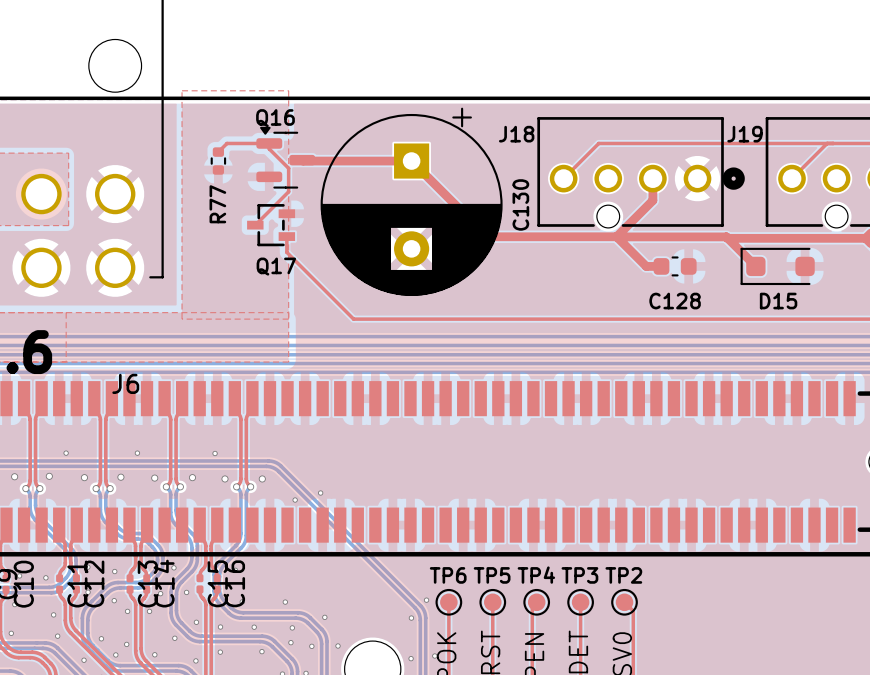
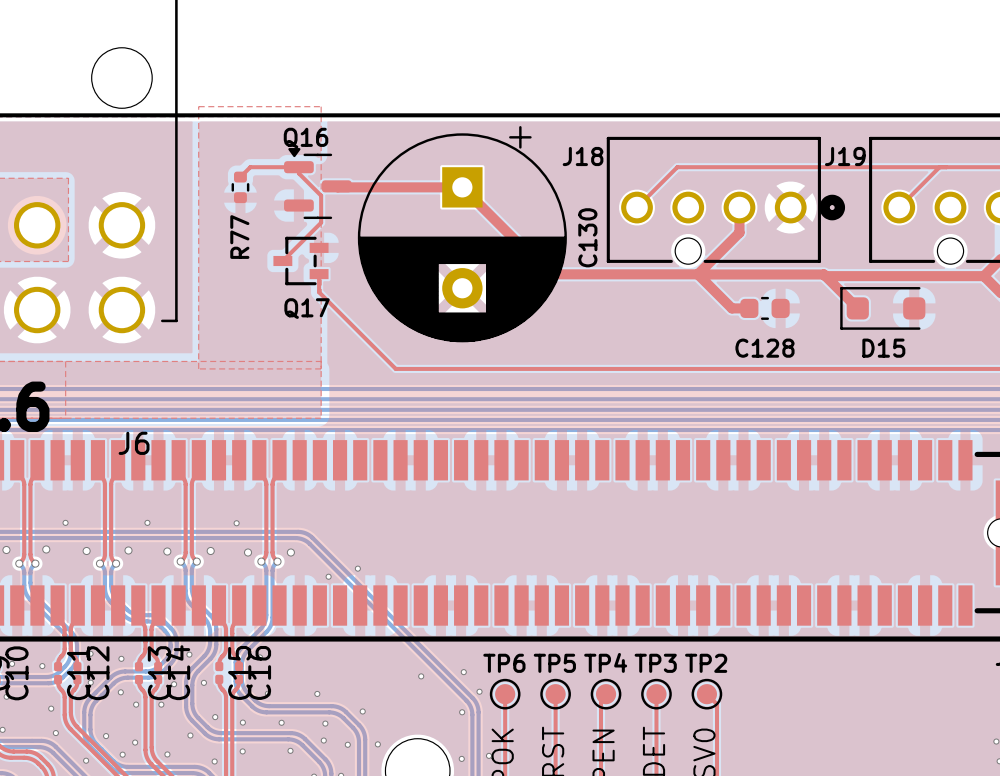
via: none -> (463, 672)
via: none -> (421, 676)

